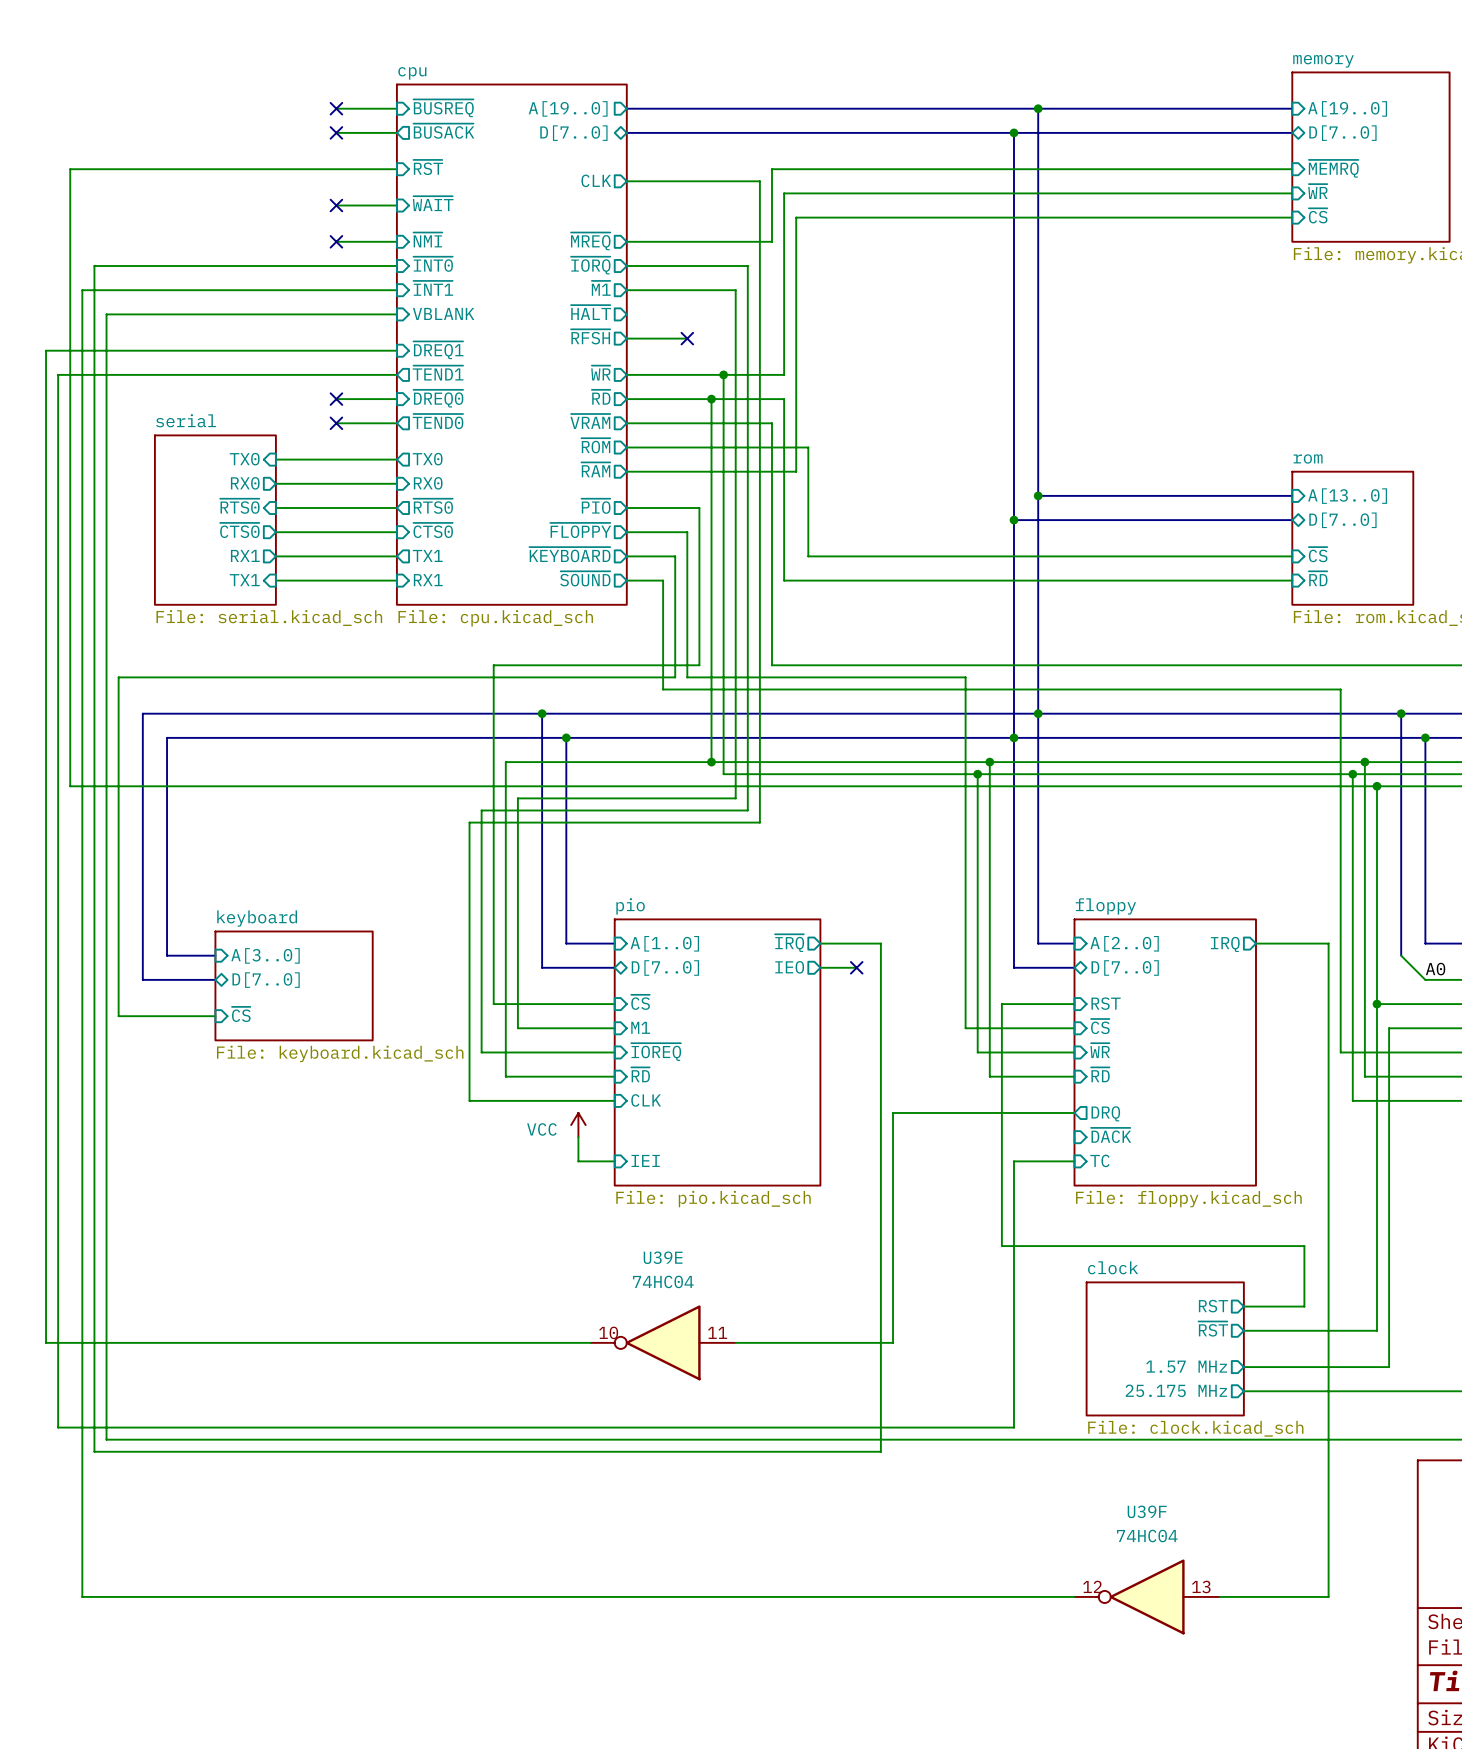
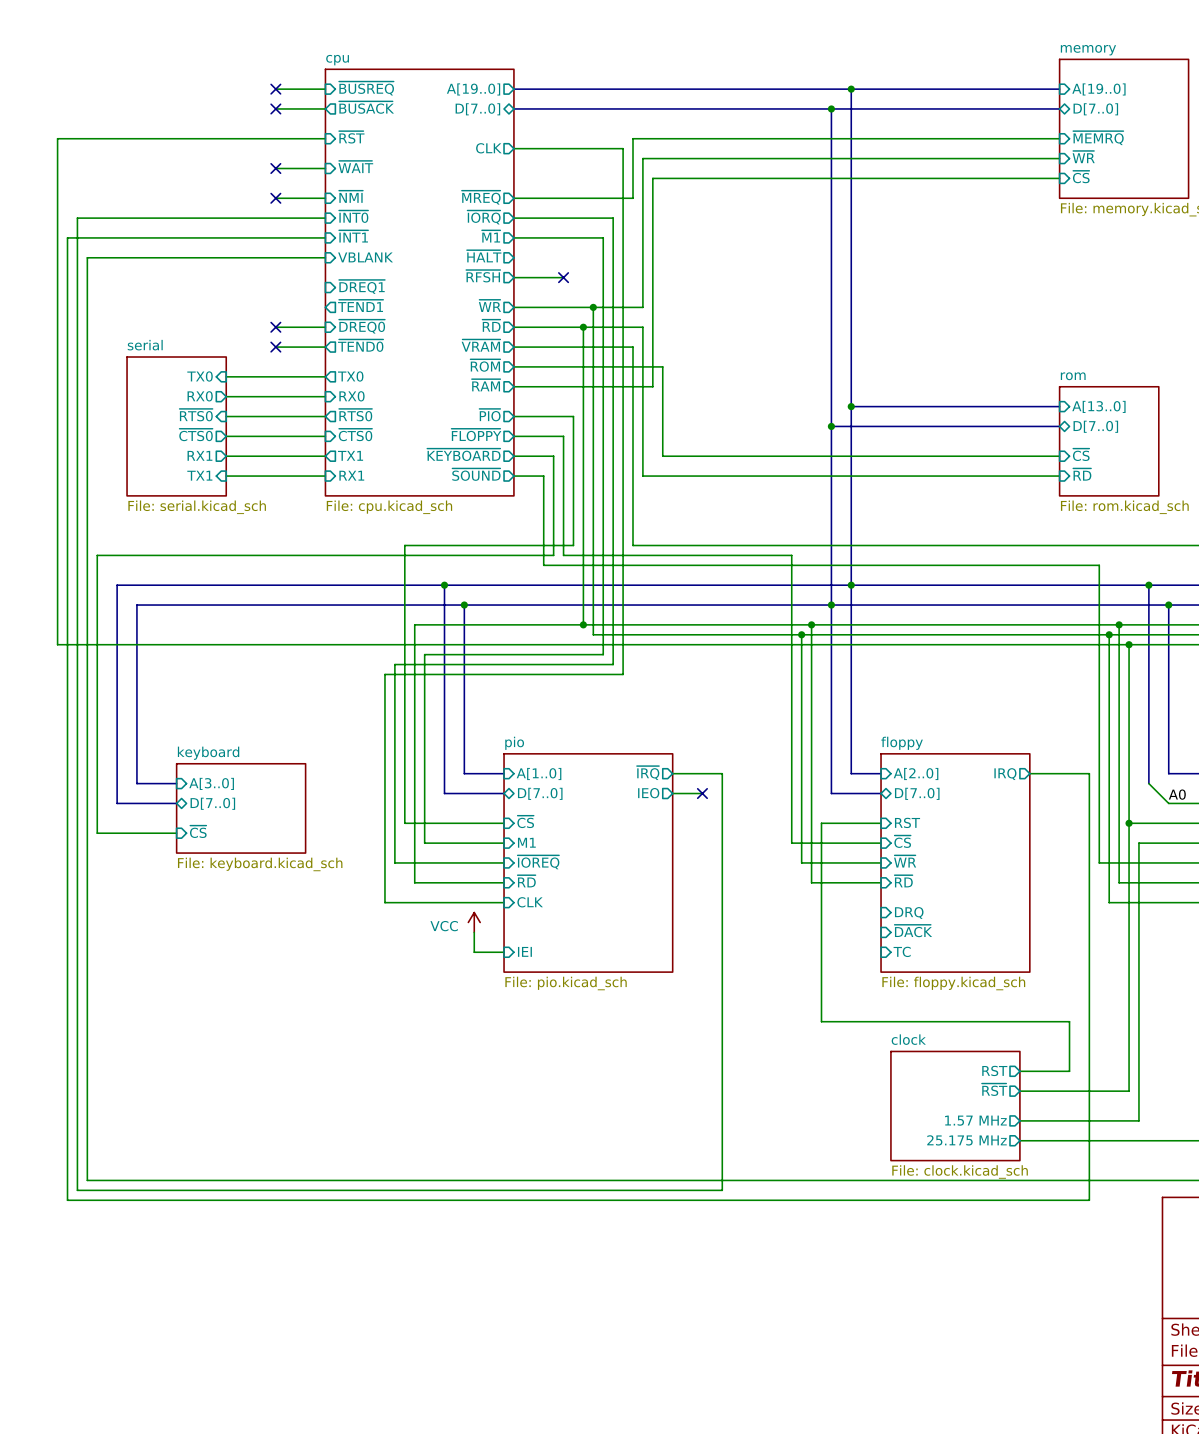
wire: (396, 350) (46, 350) (46, 1342) (590, 1342) -> none
wire: (396, 374) (58, 374) (58, 1427) (1014, 1427) (1014, 1161) (1074, 1161) -> none
wire: (1074, 1112) (893, 1112) (893, 1342) (735, 1342) -> none
sheet pin shape: output (1105, 1113) -> input (909, 912)
U39E: 74HC04 (663, 1342) -> none
wire: (82, 1463) (82, 1596) (1074, 1596) -> (67, 1200) (1089, 1200)
wire: (1328, 1463) (1328, 1596) (1219, 1596) -> none
U39F: 74HC04 (1147, 1596) -> none

